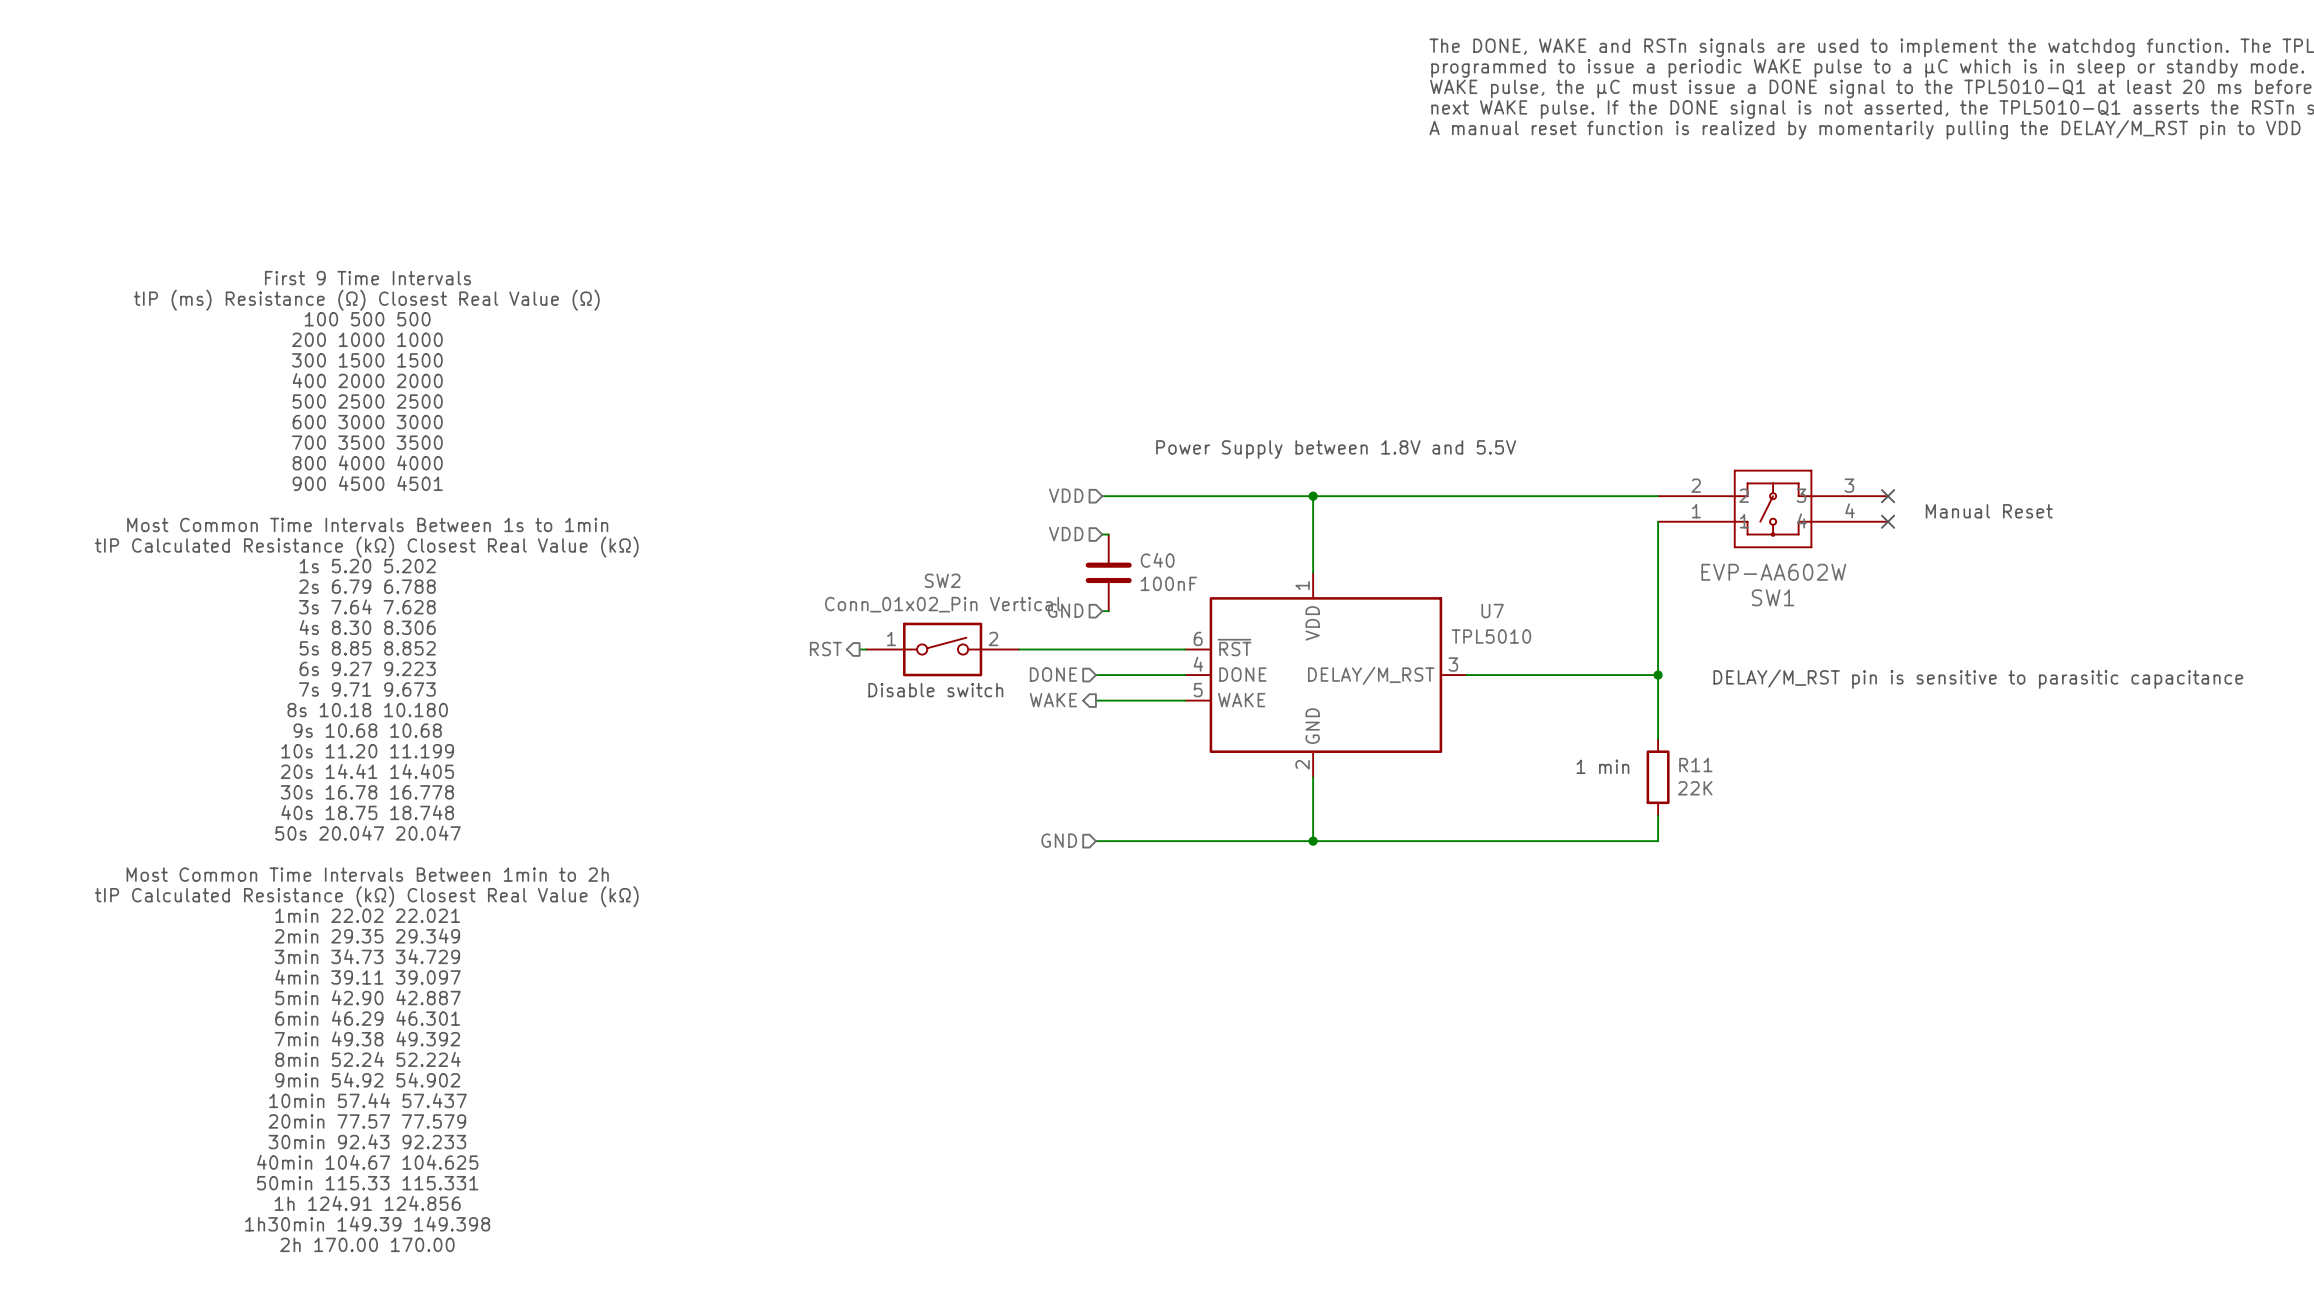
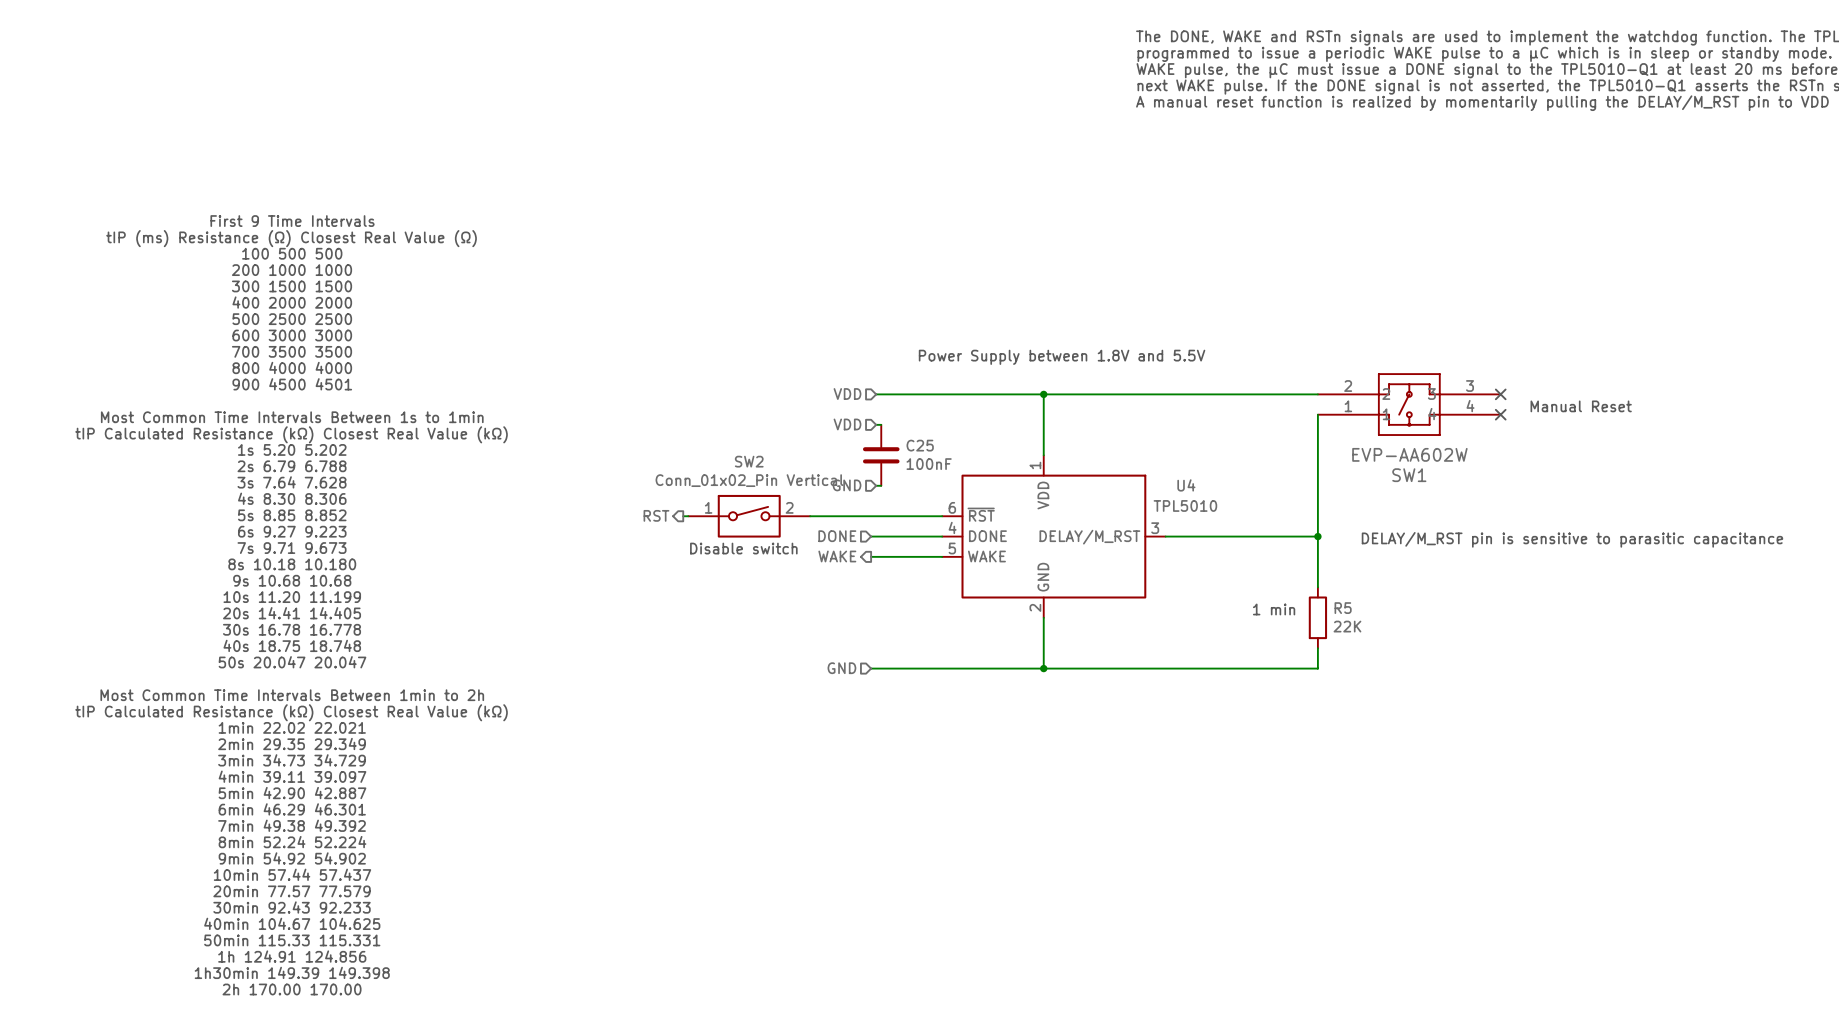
C40 name: C40 (1157, 560) -> C25 (920, 445)
U7 name: U7 (1492, 611) -> U4 (1186, 485)
R11 name: R11 (1695, 765) -> R5 (1343, 608)

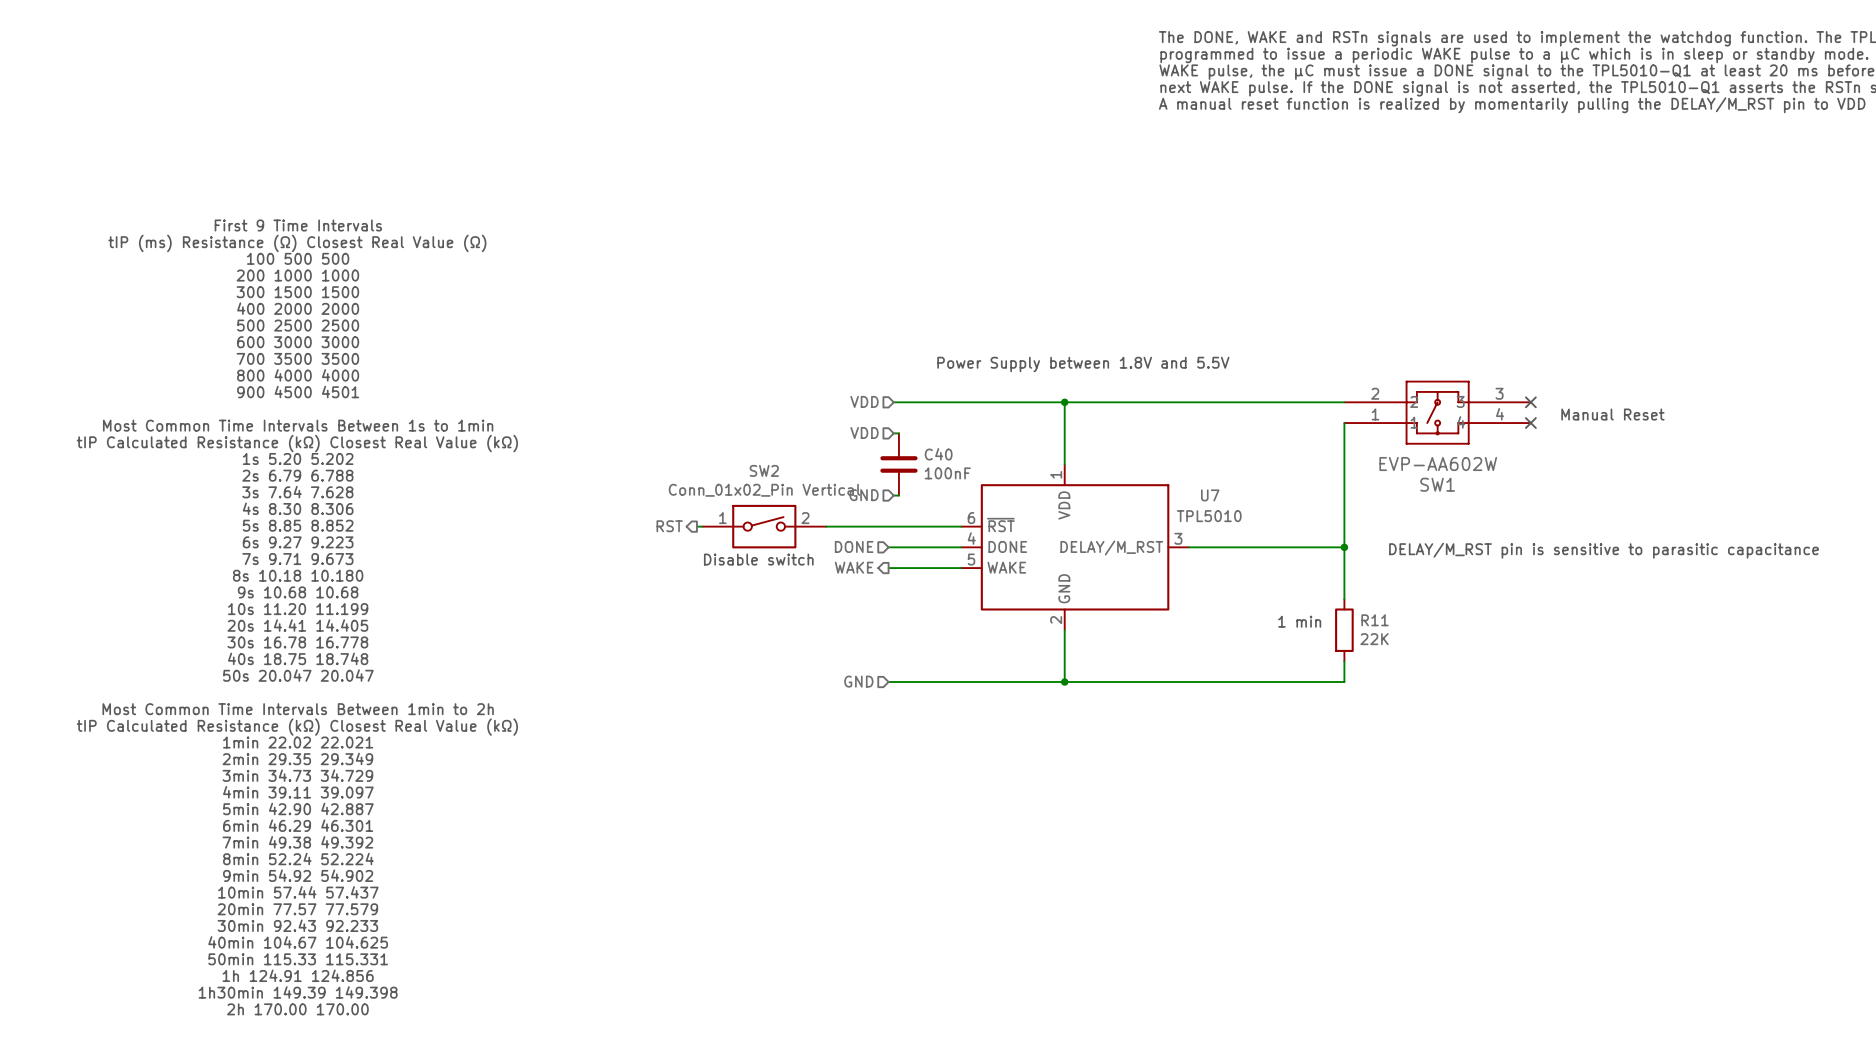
C25 name: C25 (920, 445) -> C40 (938, 454)
U4 name: U4 (1186, 485) -> U7 (1210, 495)
R5 name: R5 (1343, 608) -> R11 (1375, 620)

